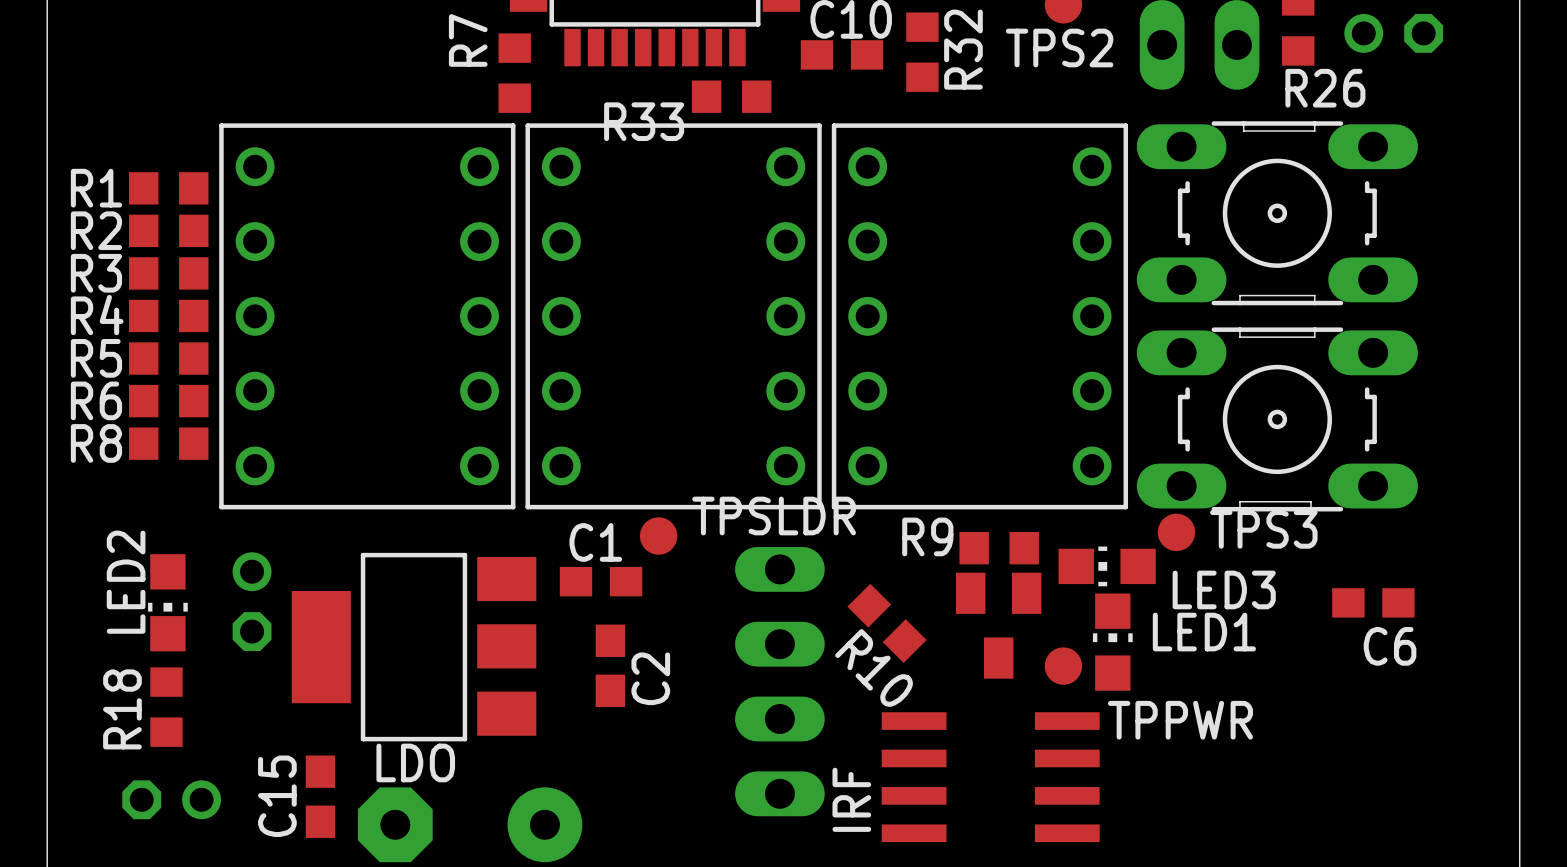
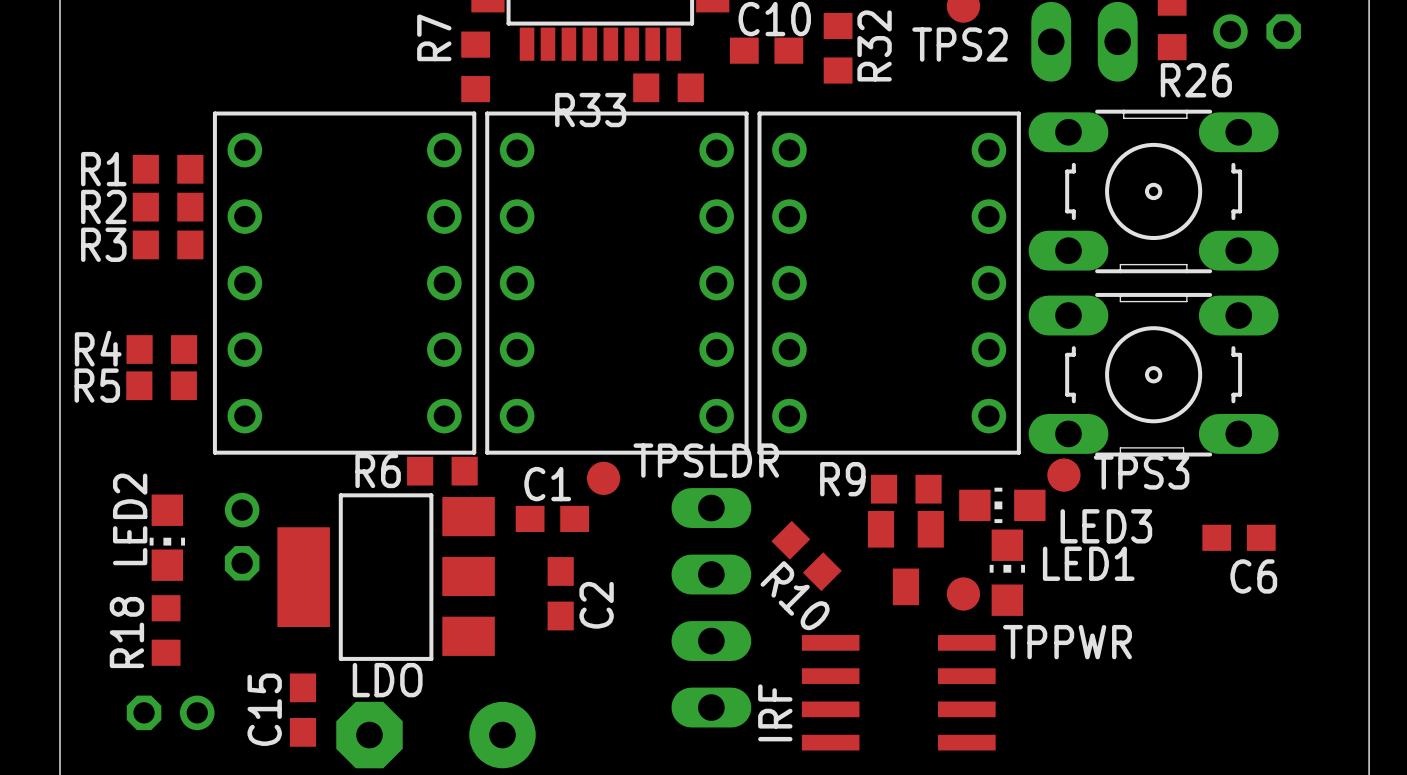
R4 position: (168, 315) -> (161, 349)
R5 position: (168, 358) -> (161, 385)
R6 position: (168, 401) -> (442, 471)
R8: (168, 443) -> none

